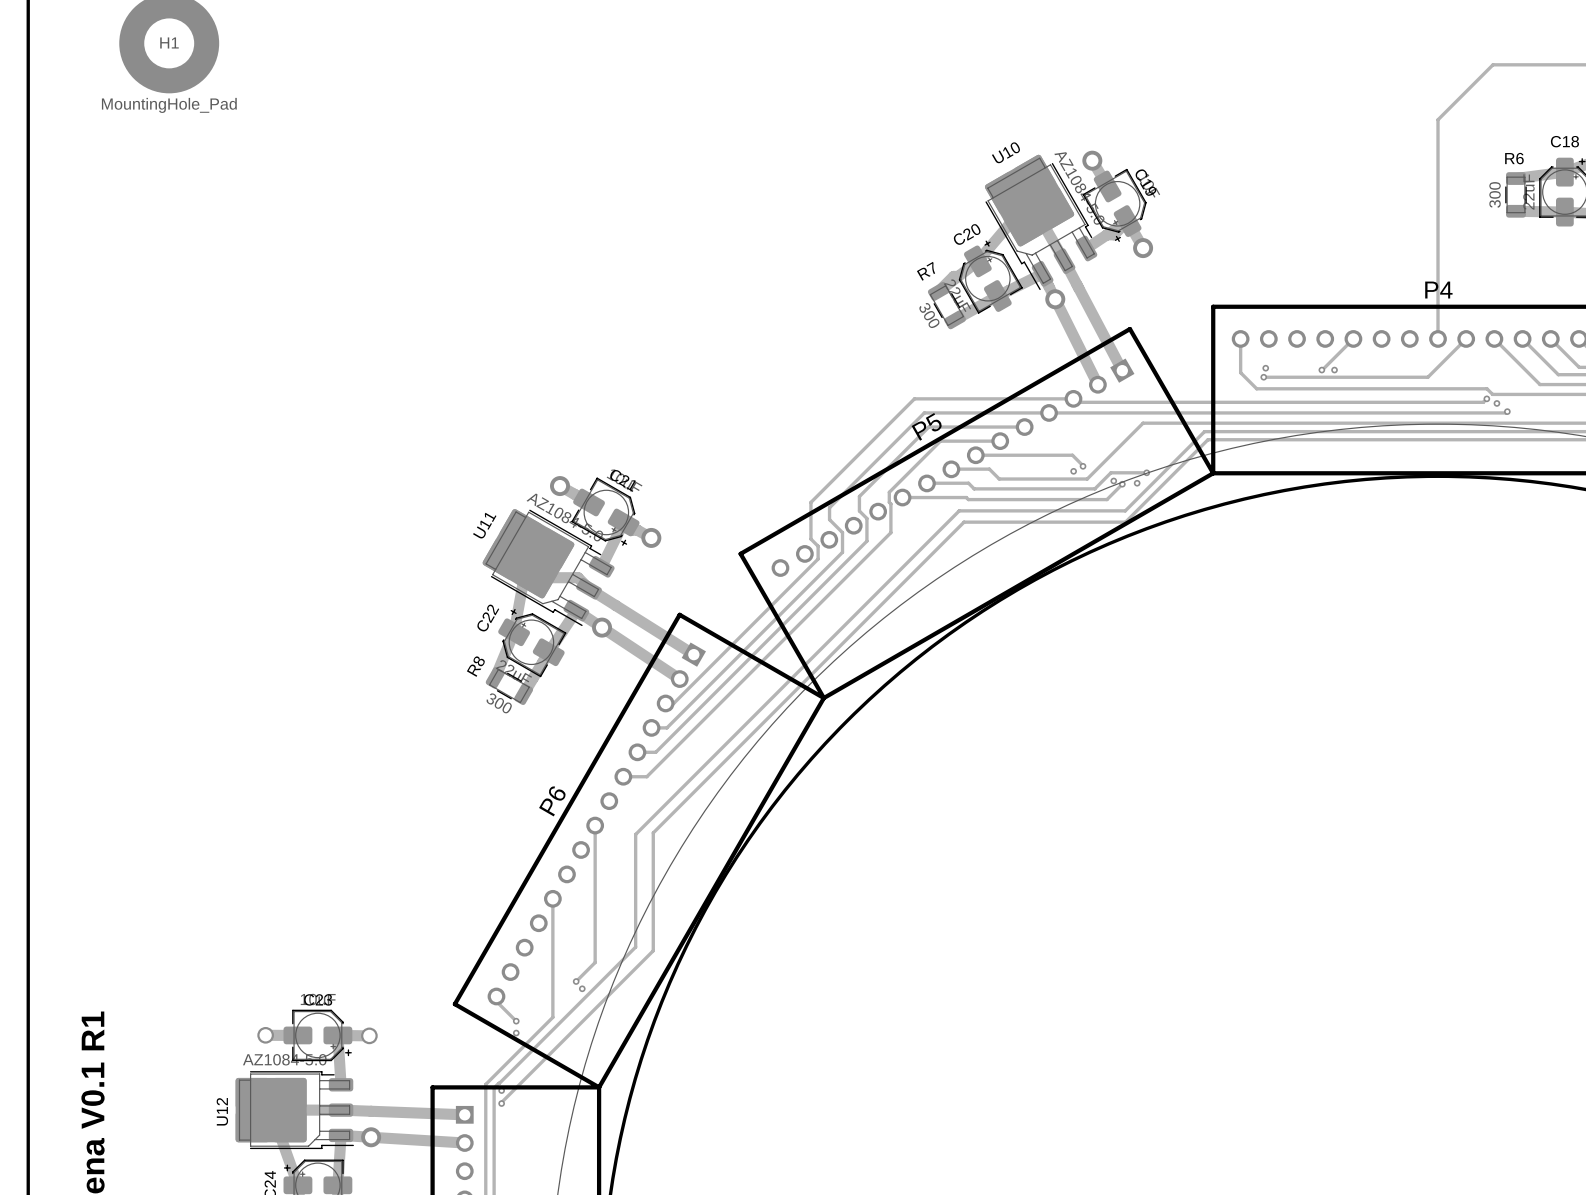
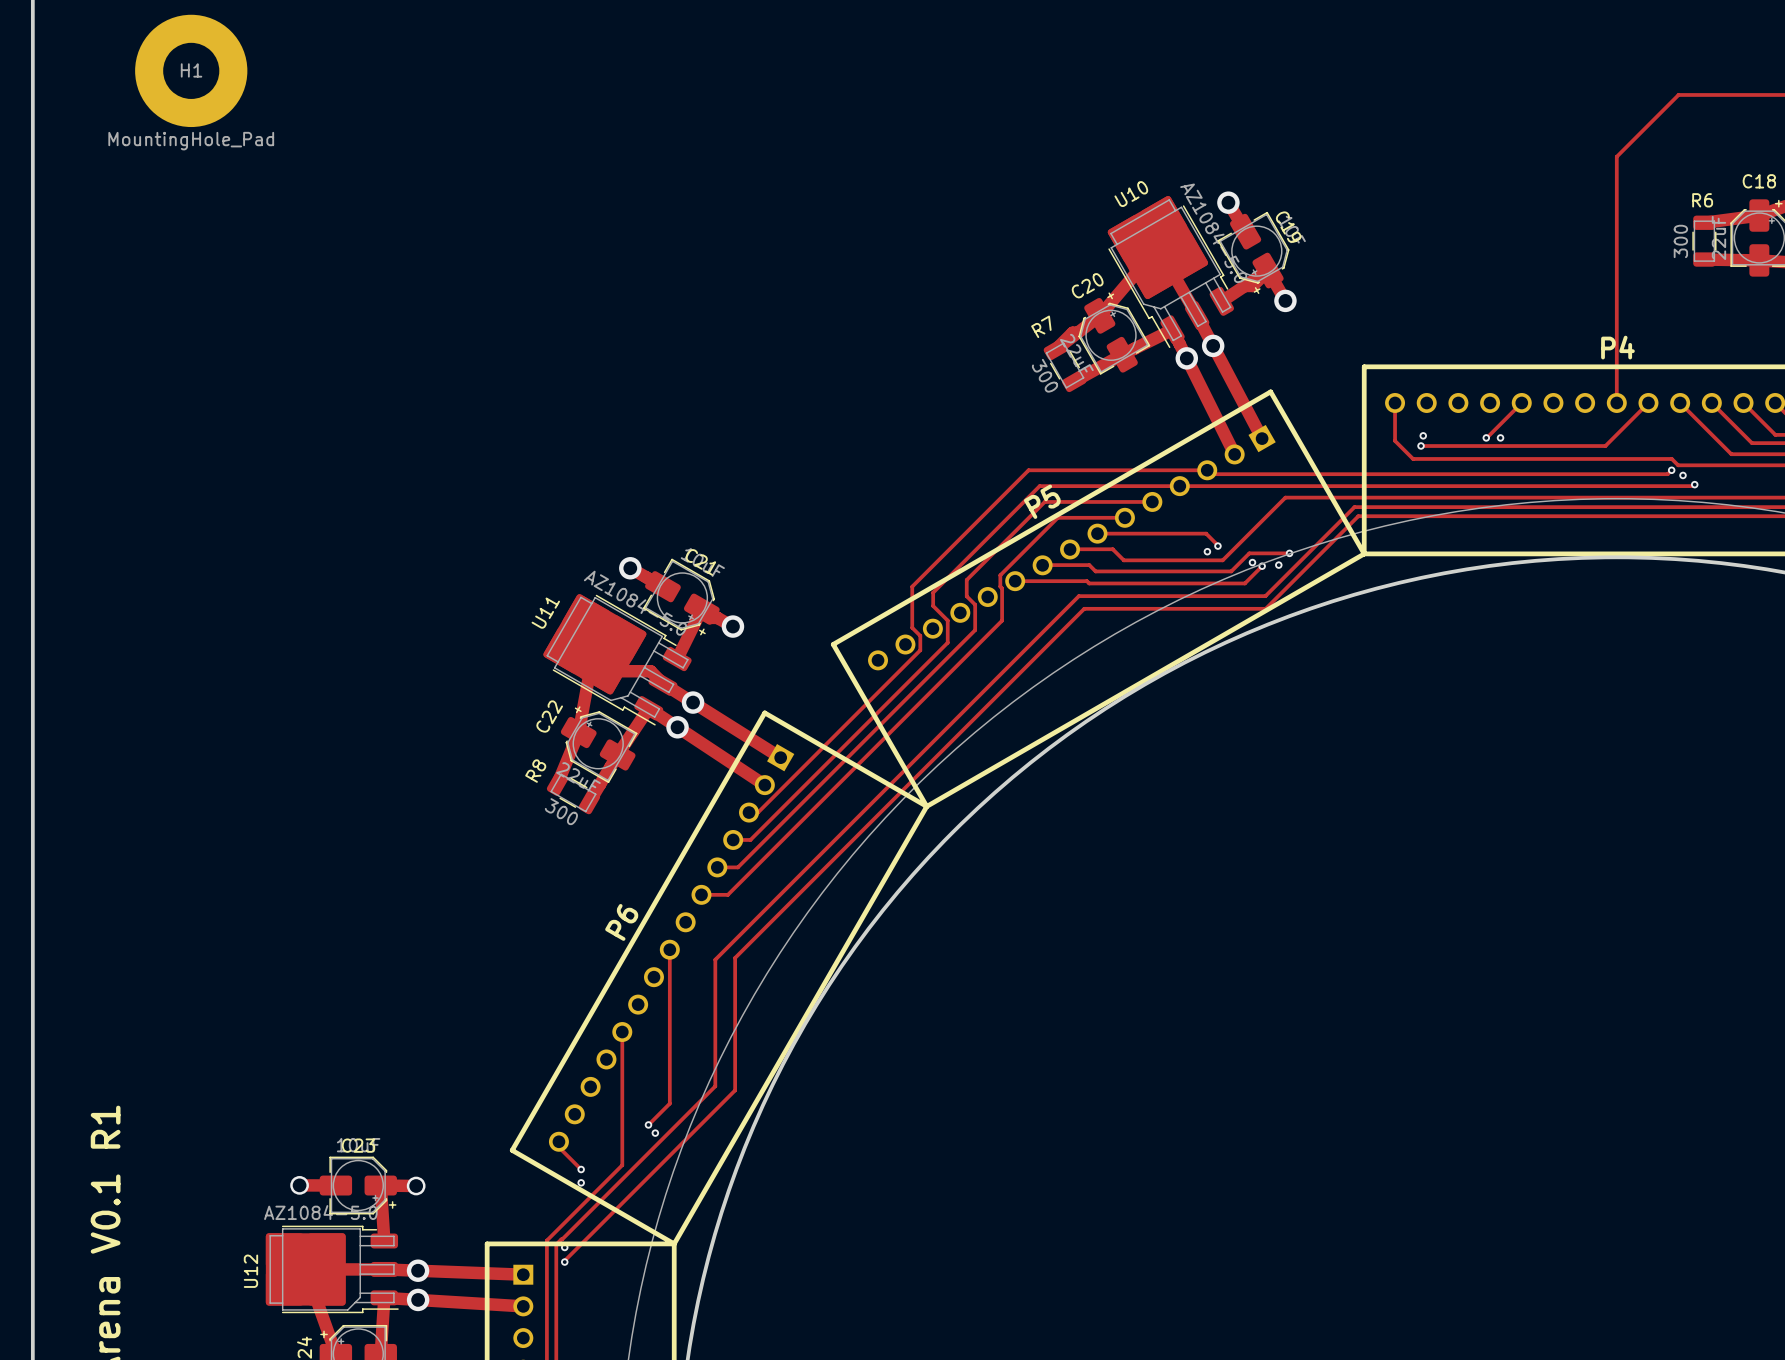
via: none -> (1213, 345)
via: none -> (693, 702)
via: none -> (418, 1270)

